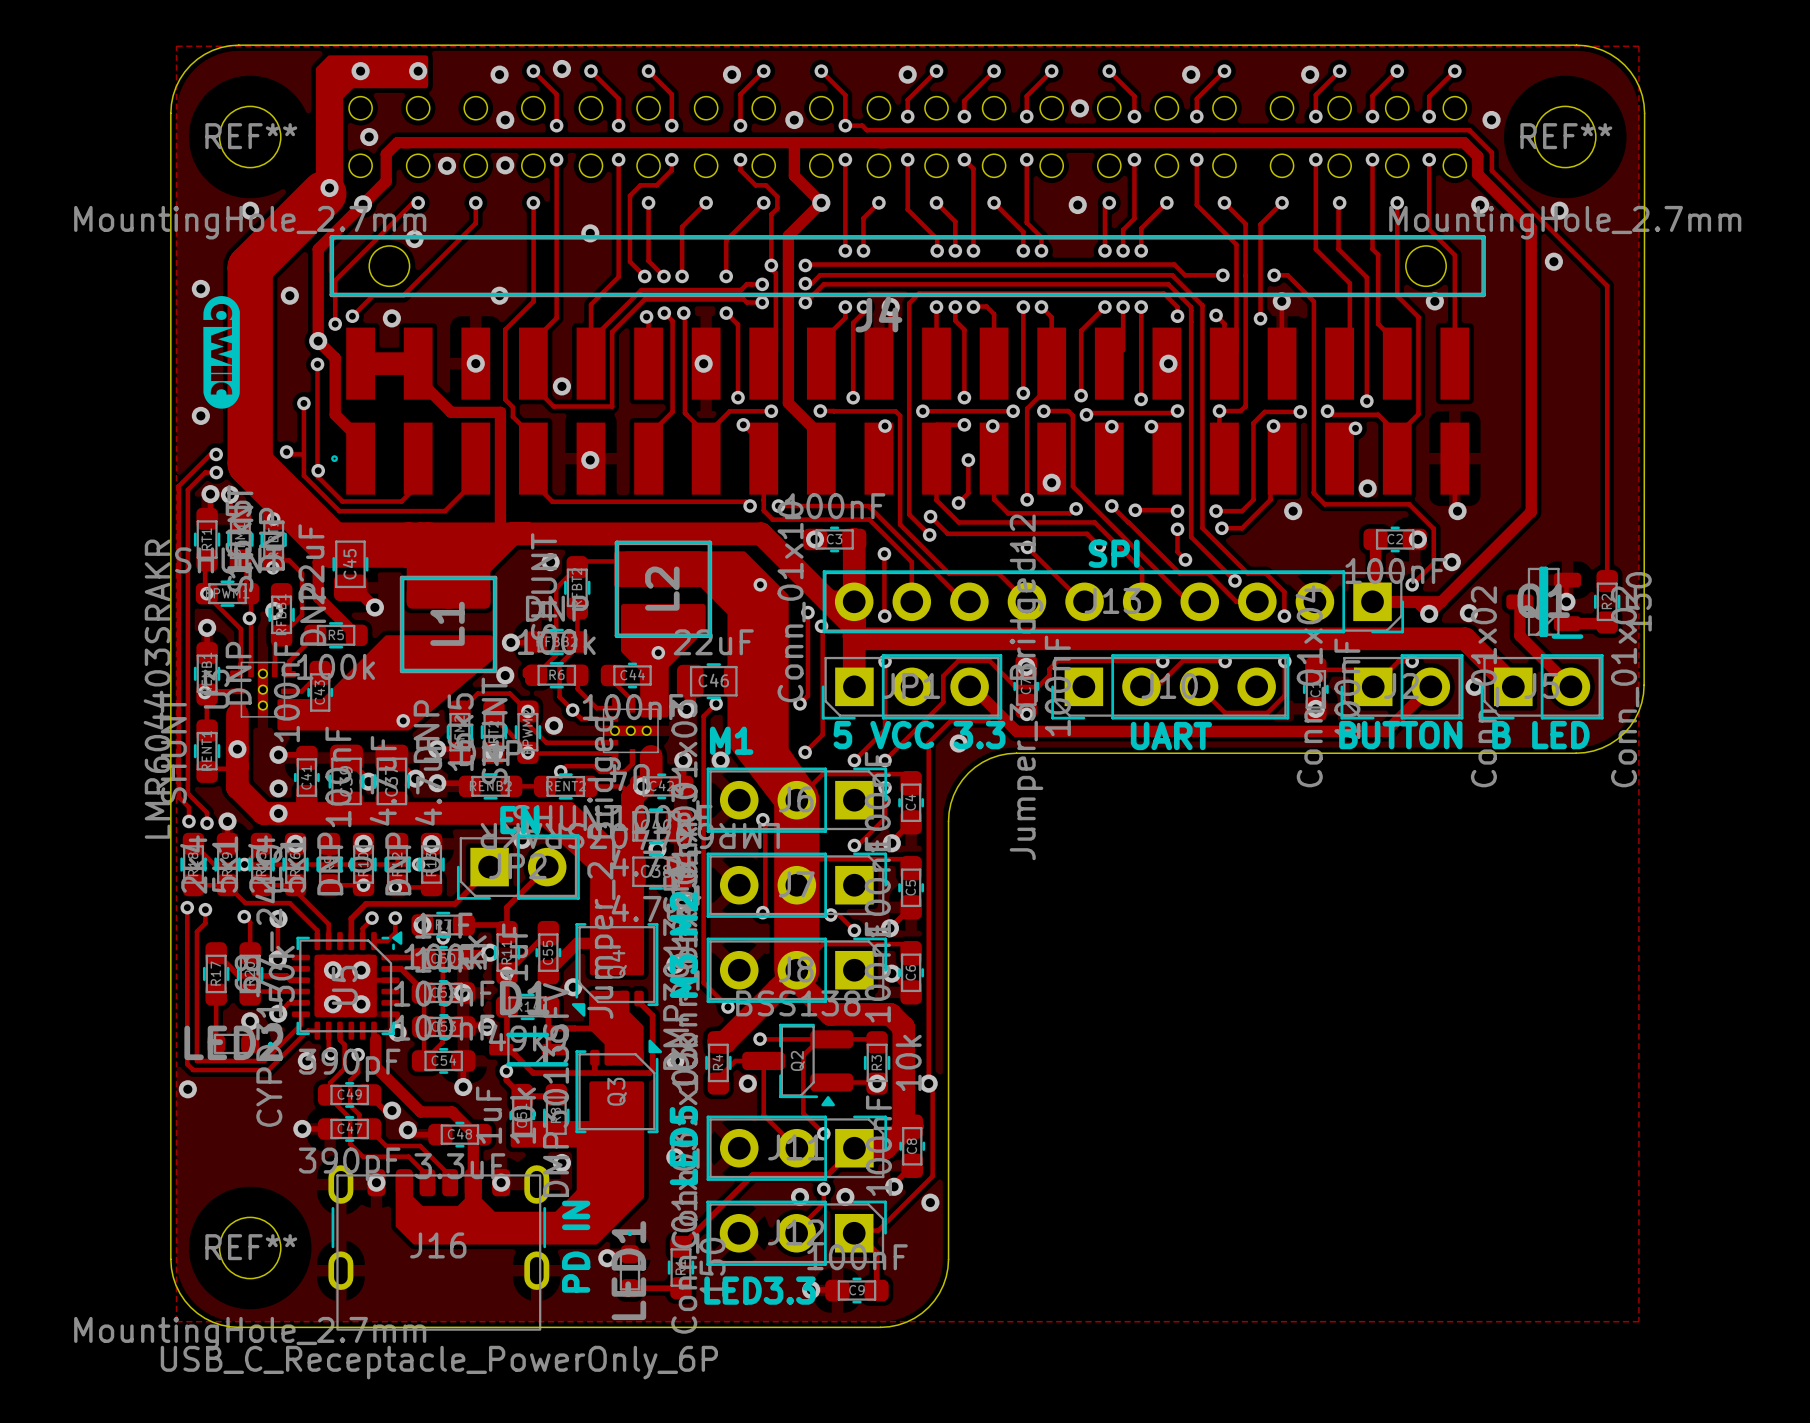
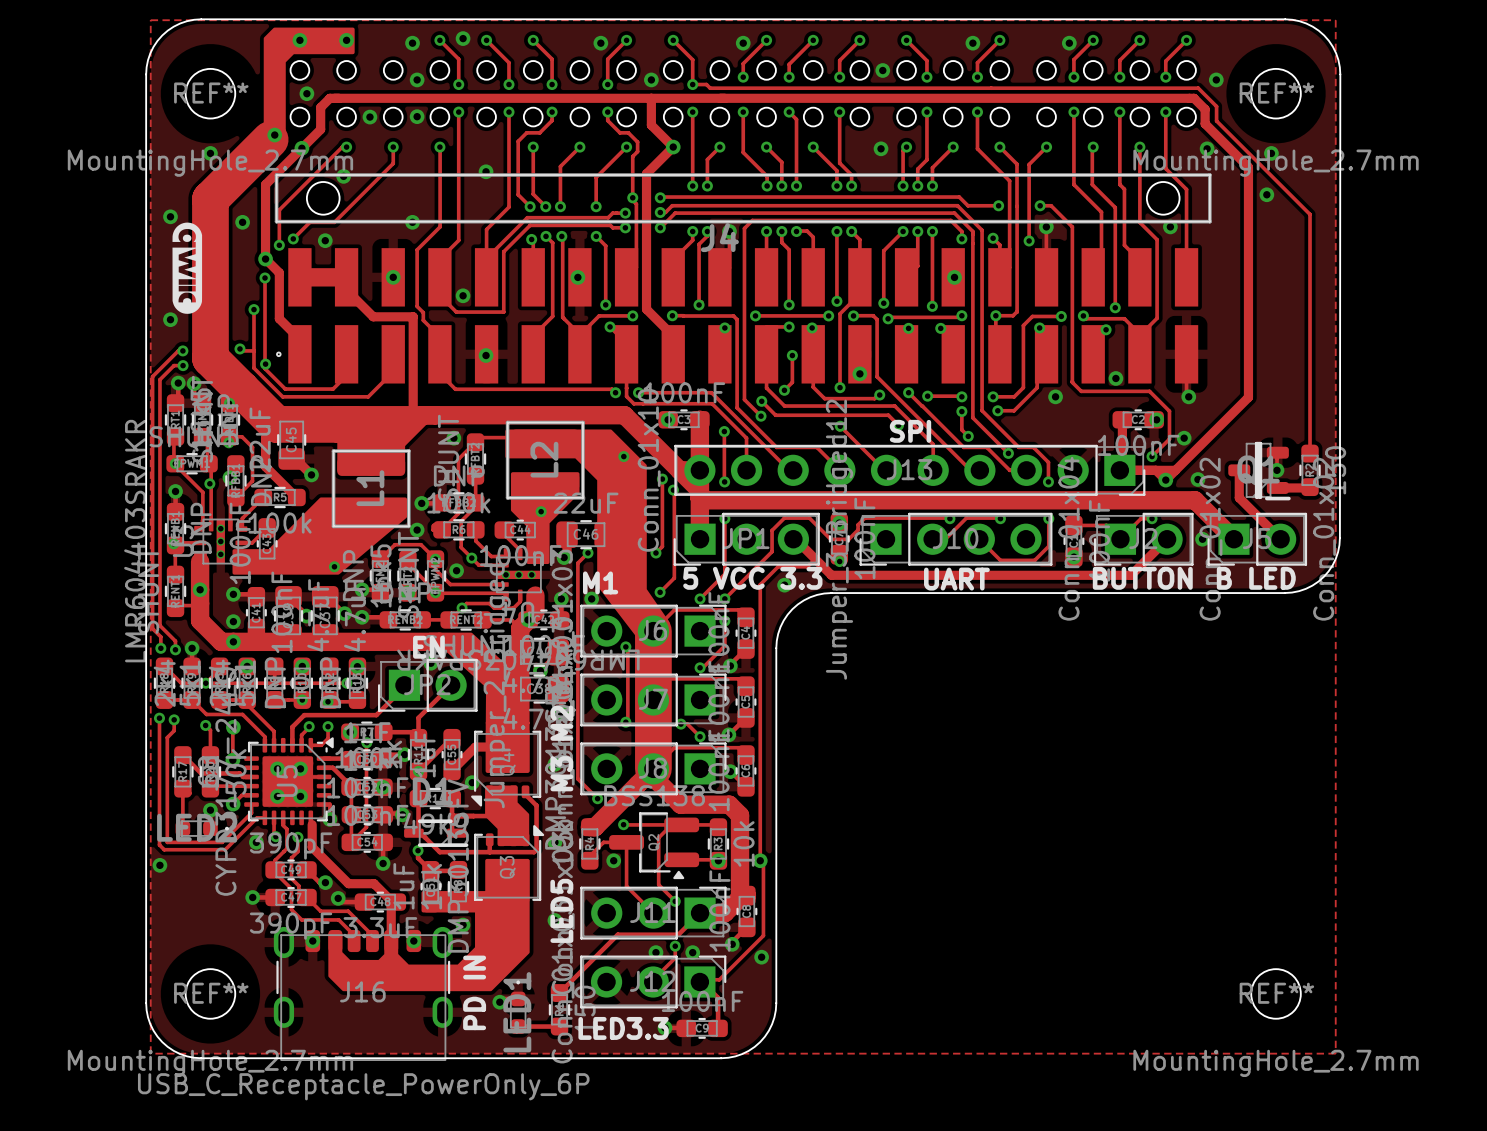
REF**: none -> MountingHole_2.7mm (1276, 993)

